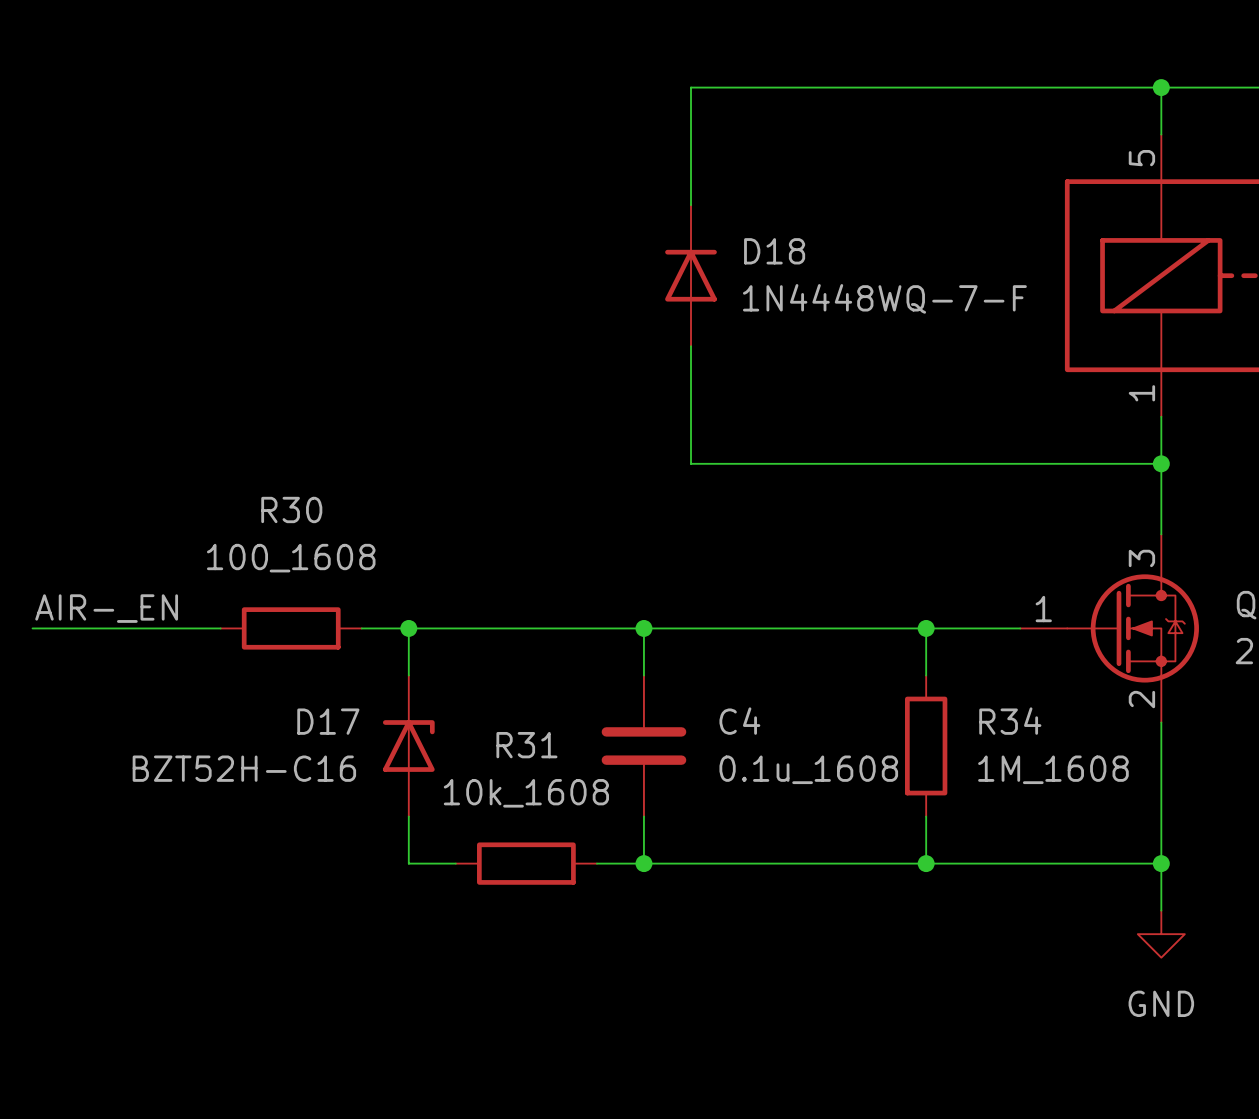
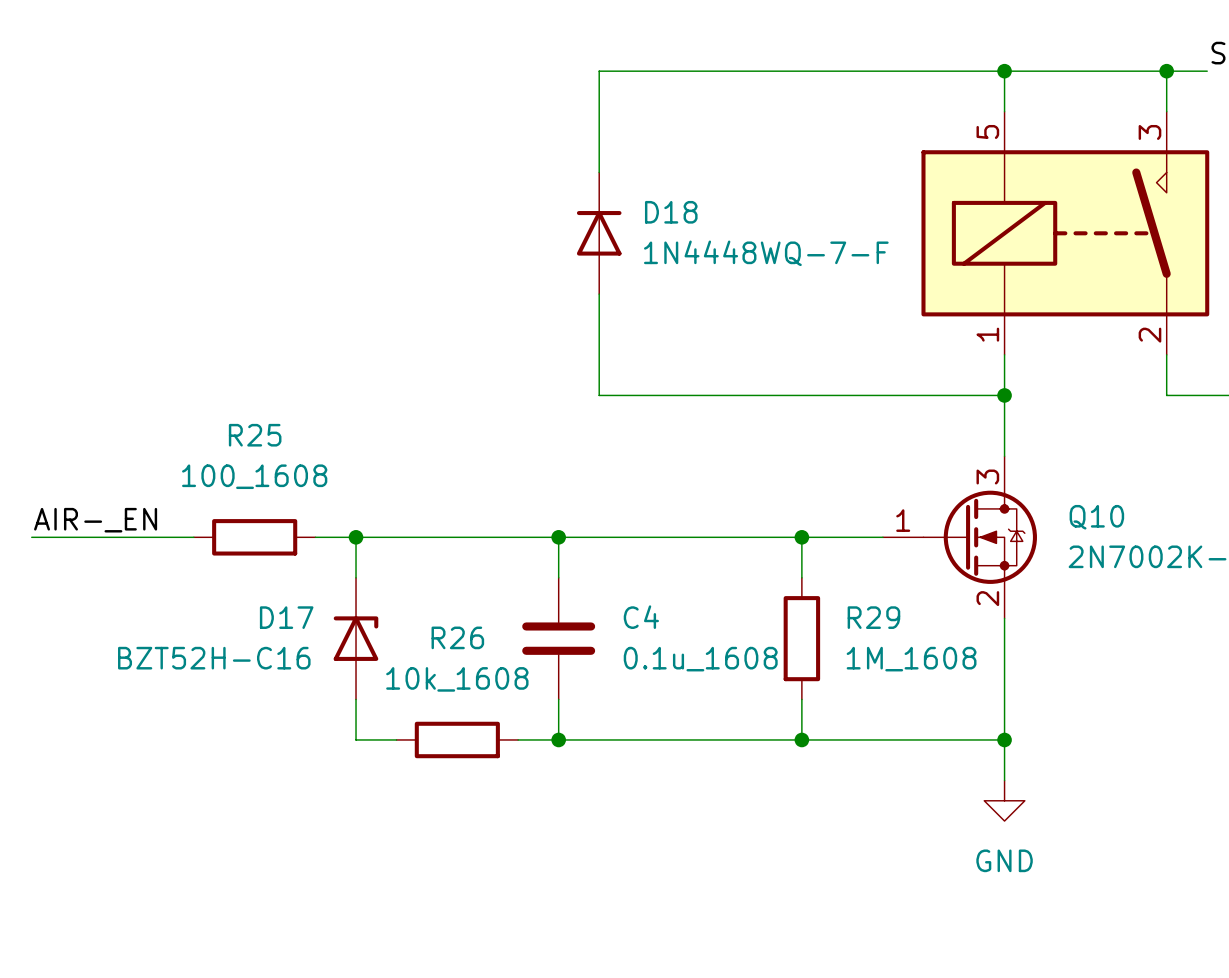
R30 name: R30 (291, 509) -> R25 (255, 435)
R34 name: R34 (1010, 721) -> R29 (873, 617)
R31 name: R31 (526, 745) -> R26 (457, 637)

